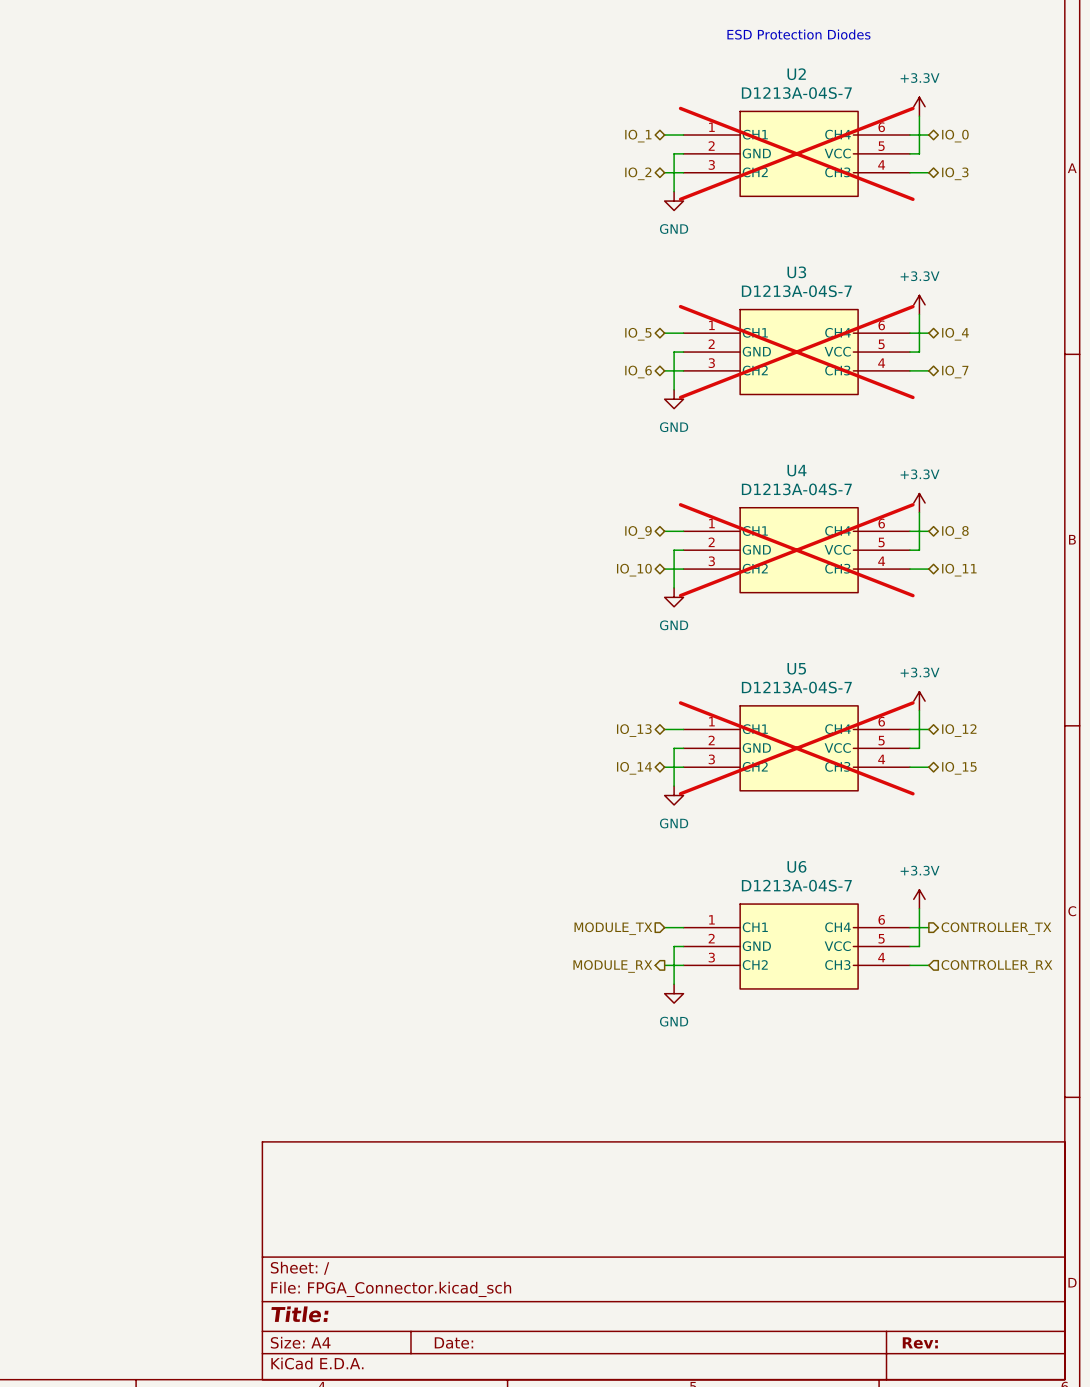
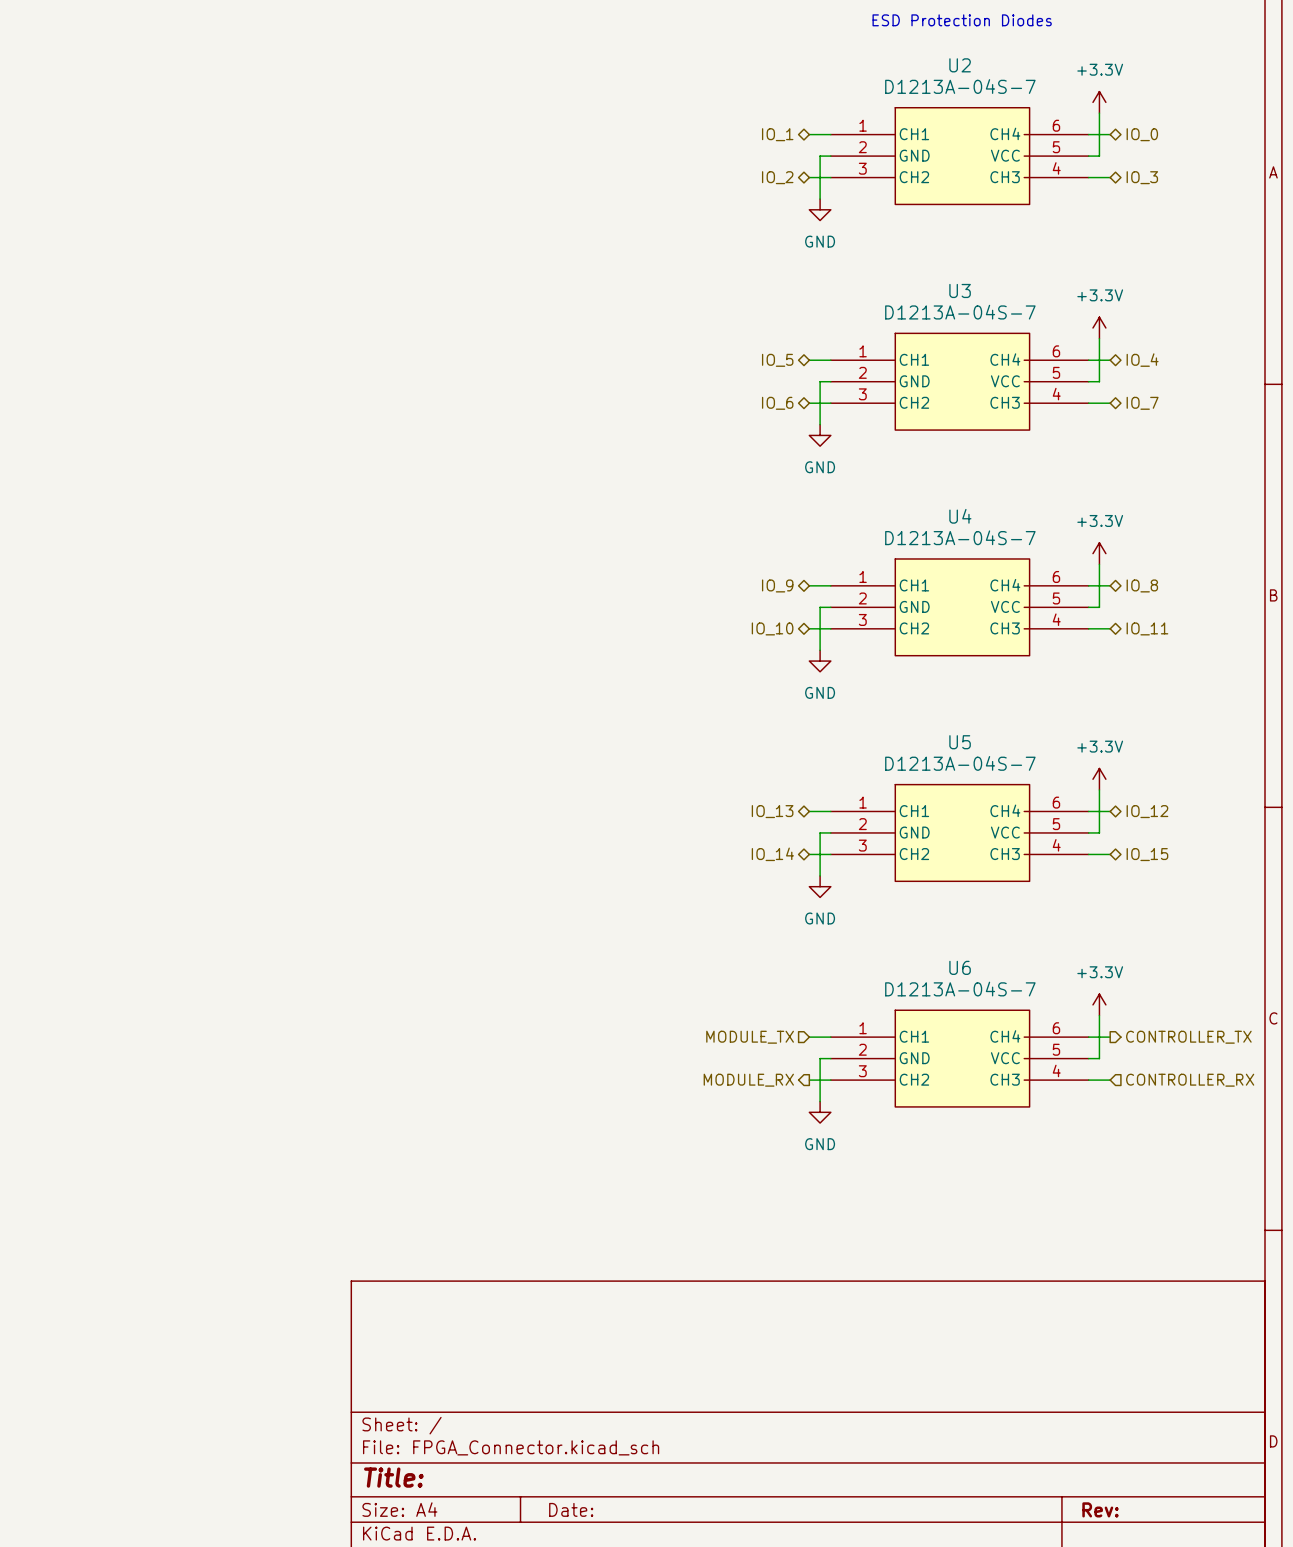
U2 do-not-place cross: (796, 153) -> none
U3 do-not-place cross: (796, 352) -> none
U4 do-not-place cross: (796, 550) -> none
U5 do-not-place cross: (796, 748) -> none

